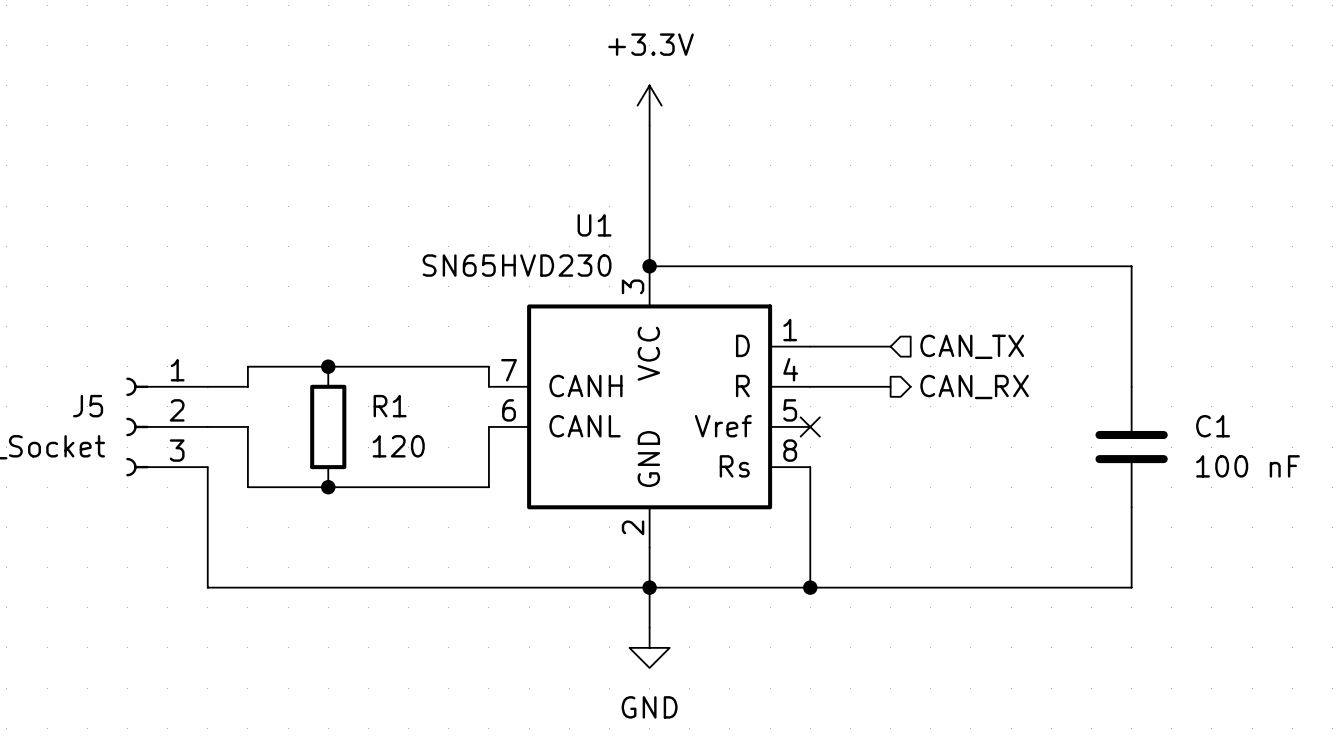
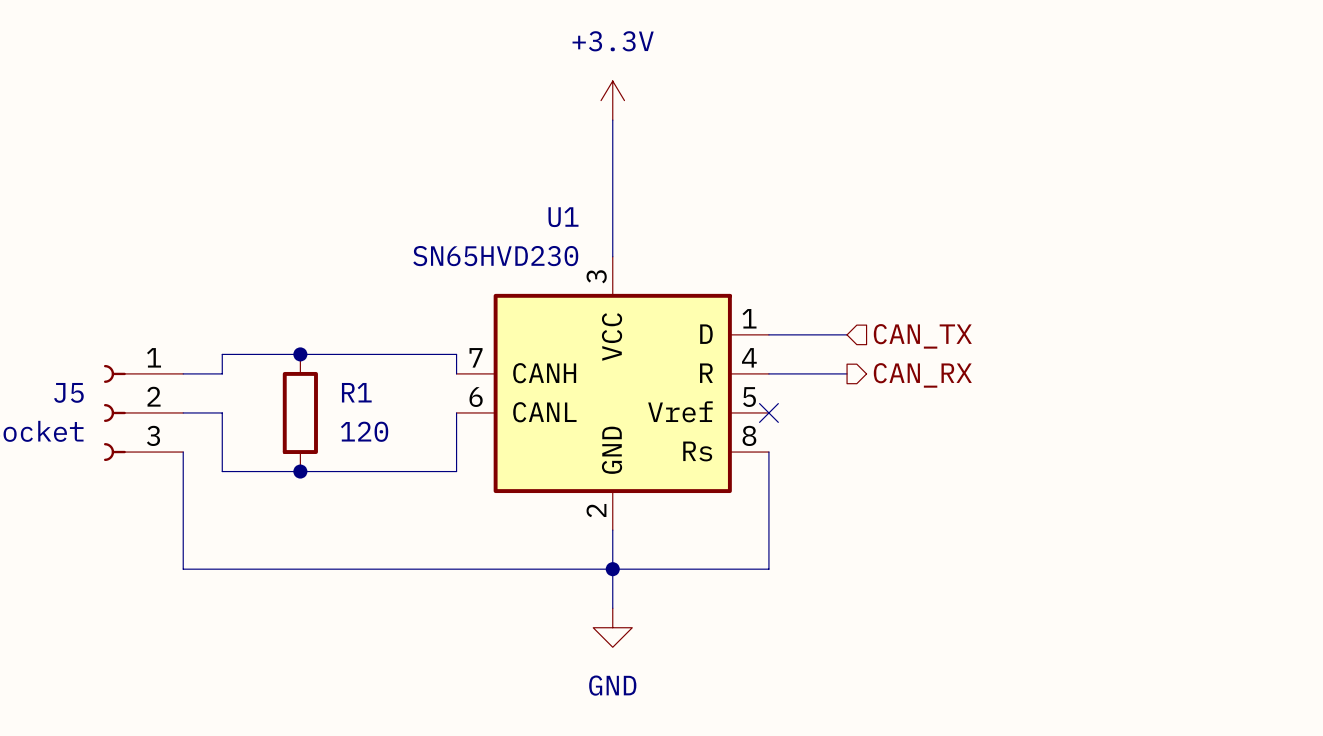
wire: (649, 266) (1131, 266) (1131, 386) -> none
junction: (649, 266) -> none
C1: 100 nF (1131, 447) -> none
wire: (1131, 507) (1131, 587) (810, 587) -> none
junction: (810, 587) -> none

